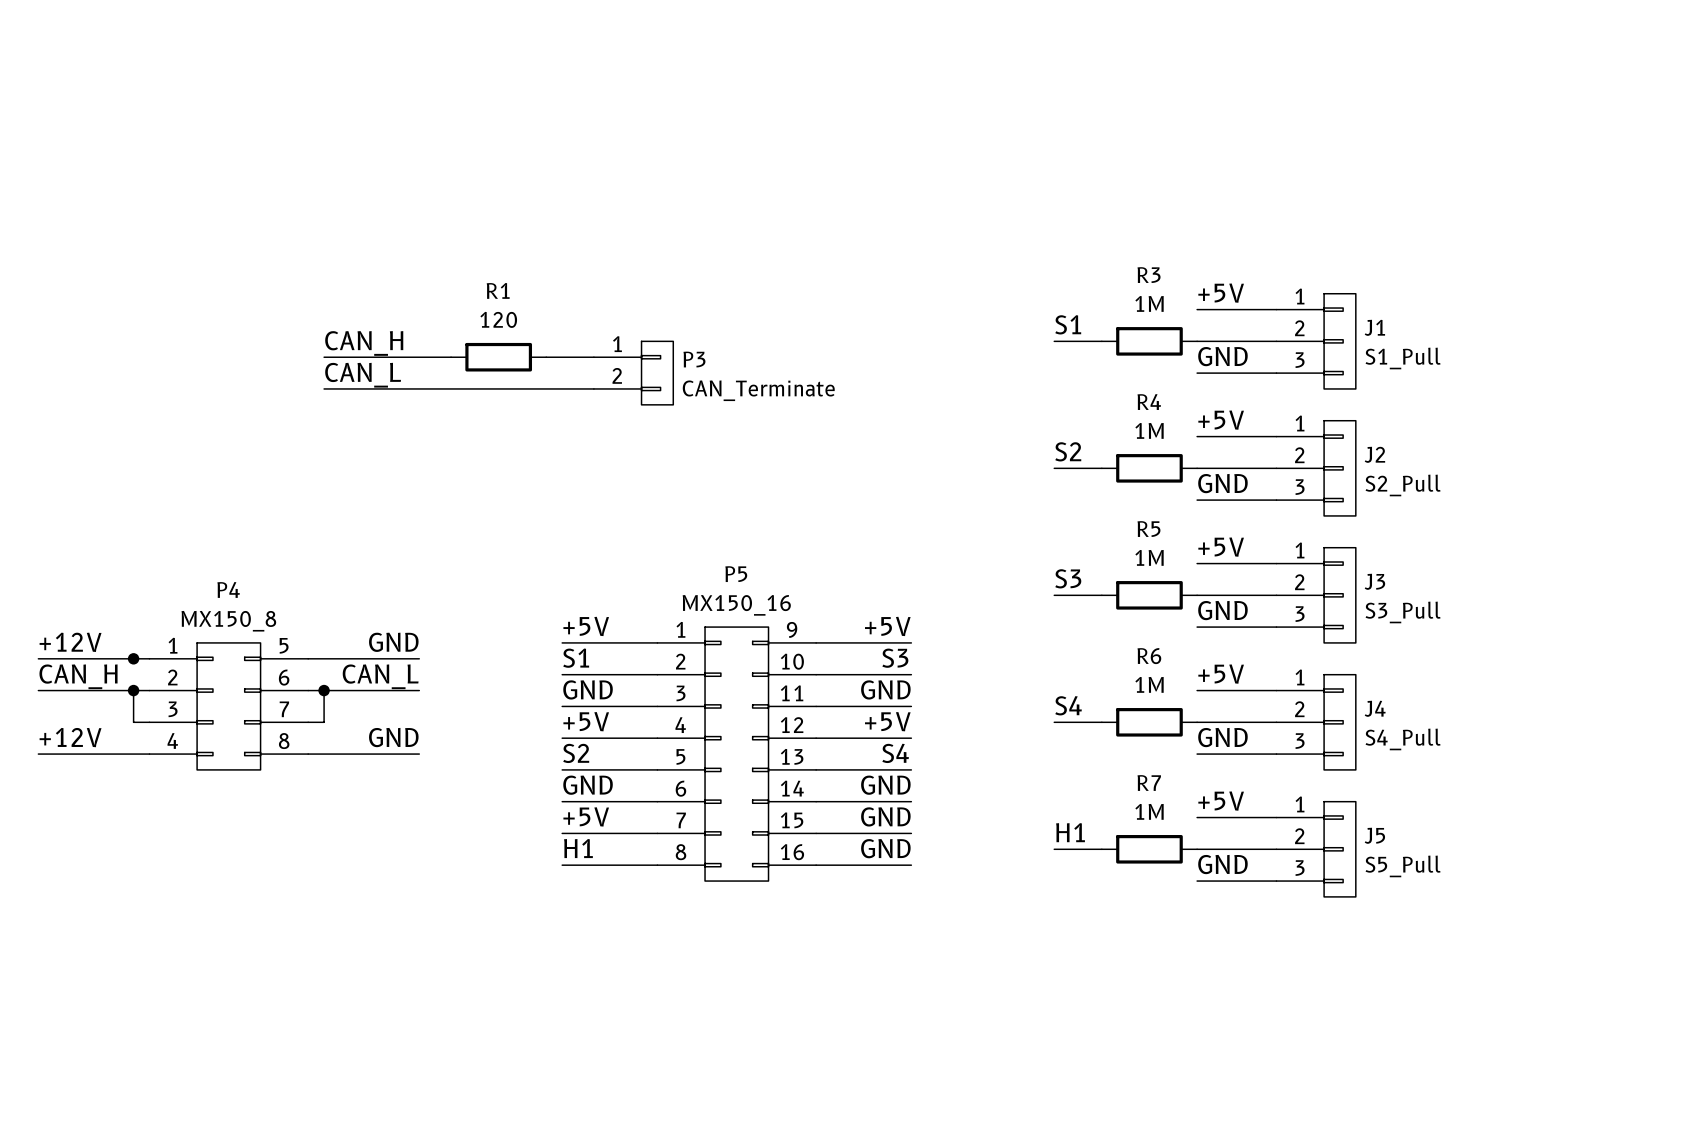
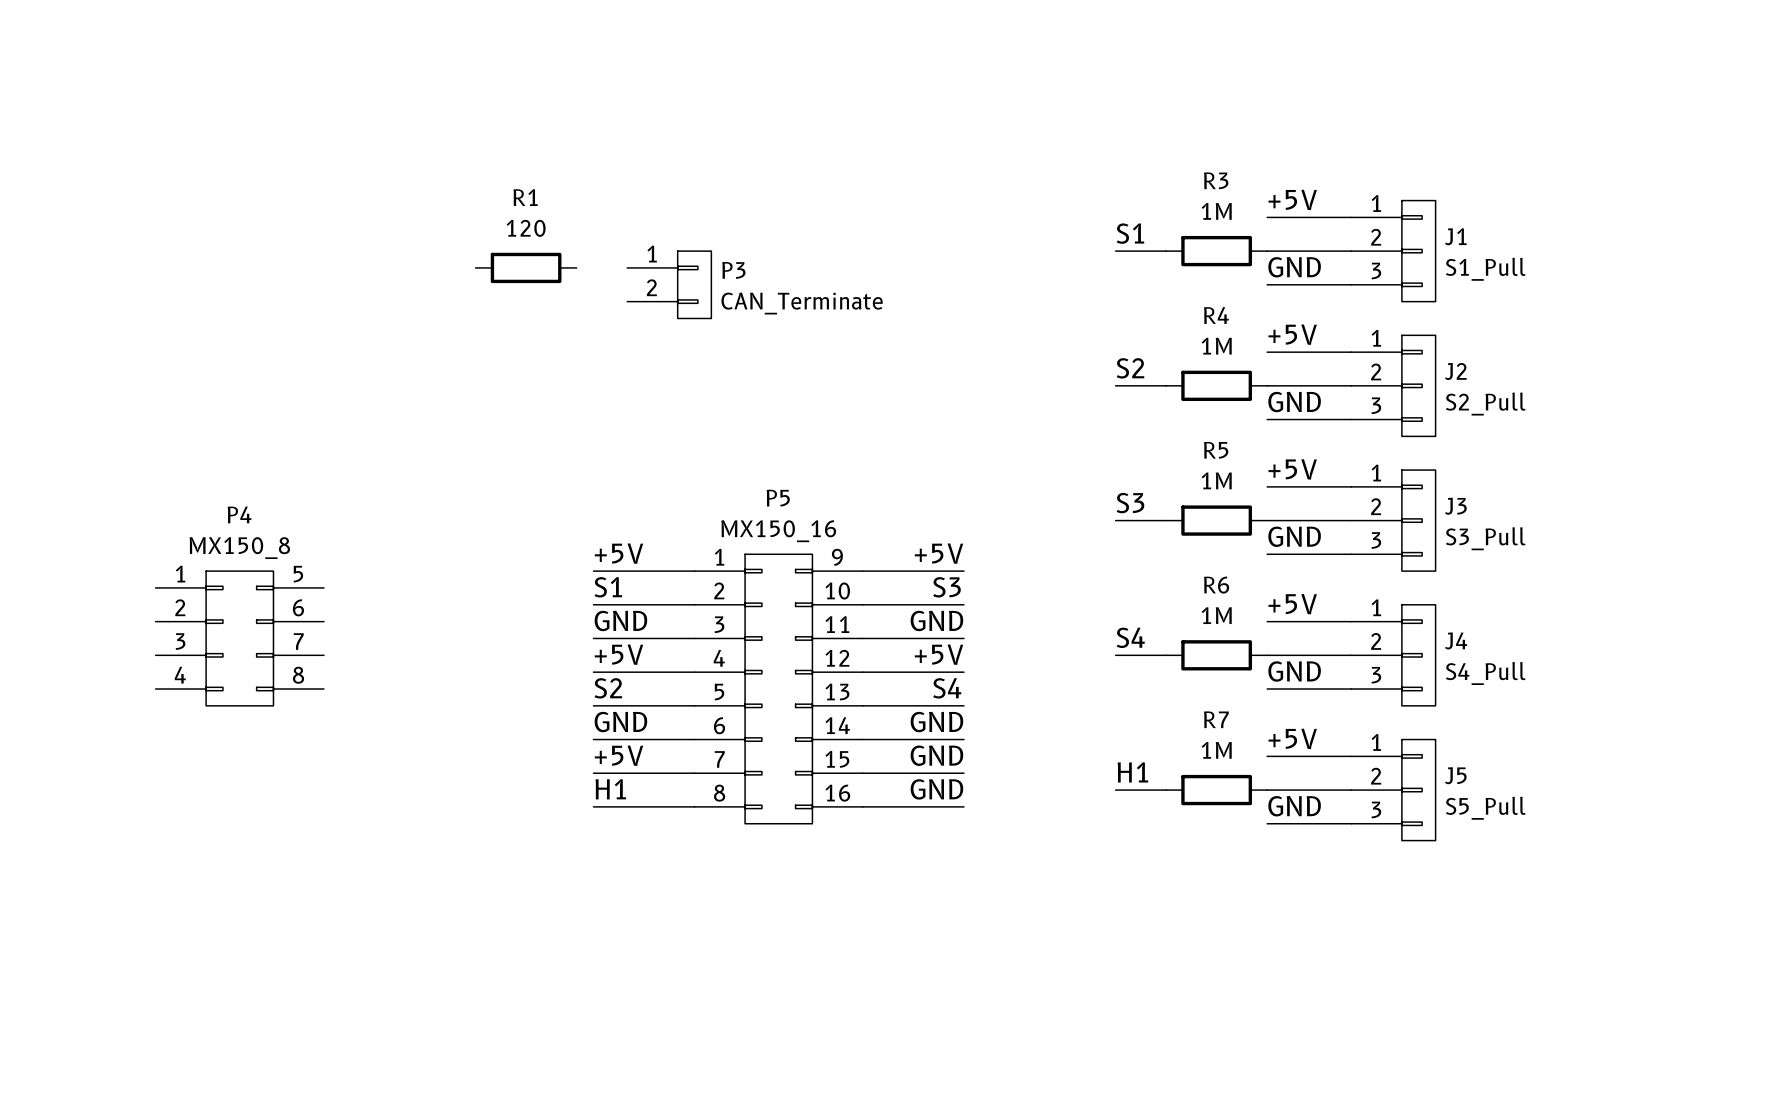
label: CAN_H (364, 343) -> none
wire: (324, 357) (451, 357) -> none
wire: (546, 357) (593, 357) -> none
label: CAN_L (363, 375) -> none
wire: (324, 388) (593, 388) -> none
label: +12V (70, 642) -> none
label: GND (393, 642) -> none
wire: (38, 658) (149, 658) -> none
junction: (133, 658) -> none
wire: (308, 658) (419, 658) -> none
label: CAN_H (78, 676) -> none
label: CAN_L (380, 676) -> none
wire: (38, 690) (149, 690) -> none
wire: (133, 690) (133, 722) (149, 722) -> none
junction: (133, 690) -> none
wire: (308, 690) (419, 690) -> none
wire: (324, 690) (324, 722) (308, 722) -> none
junction: (324, 690) -> none
label: +12V (70, 737) -> none
label: GND (393, 737) -> none
wire: (38, 754) (149, 754) -> none
wire: (308, 754) (419, 754) -> none

